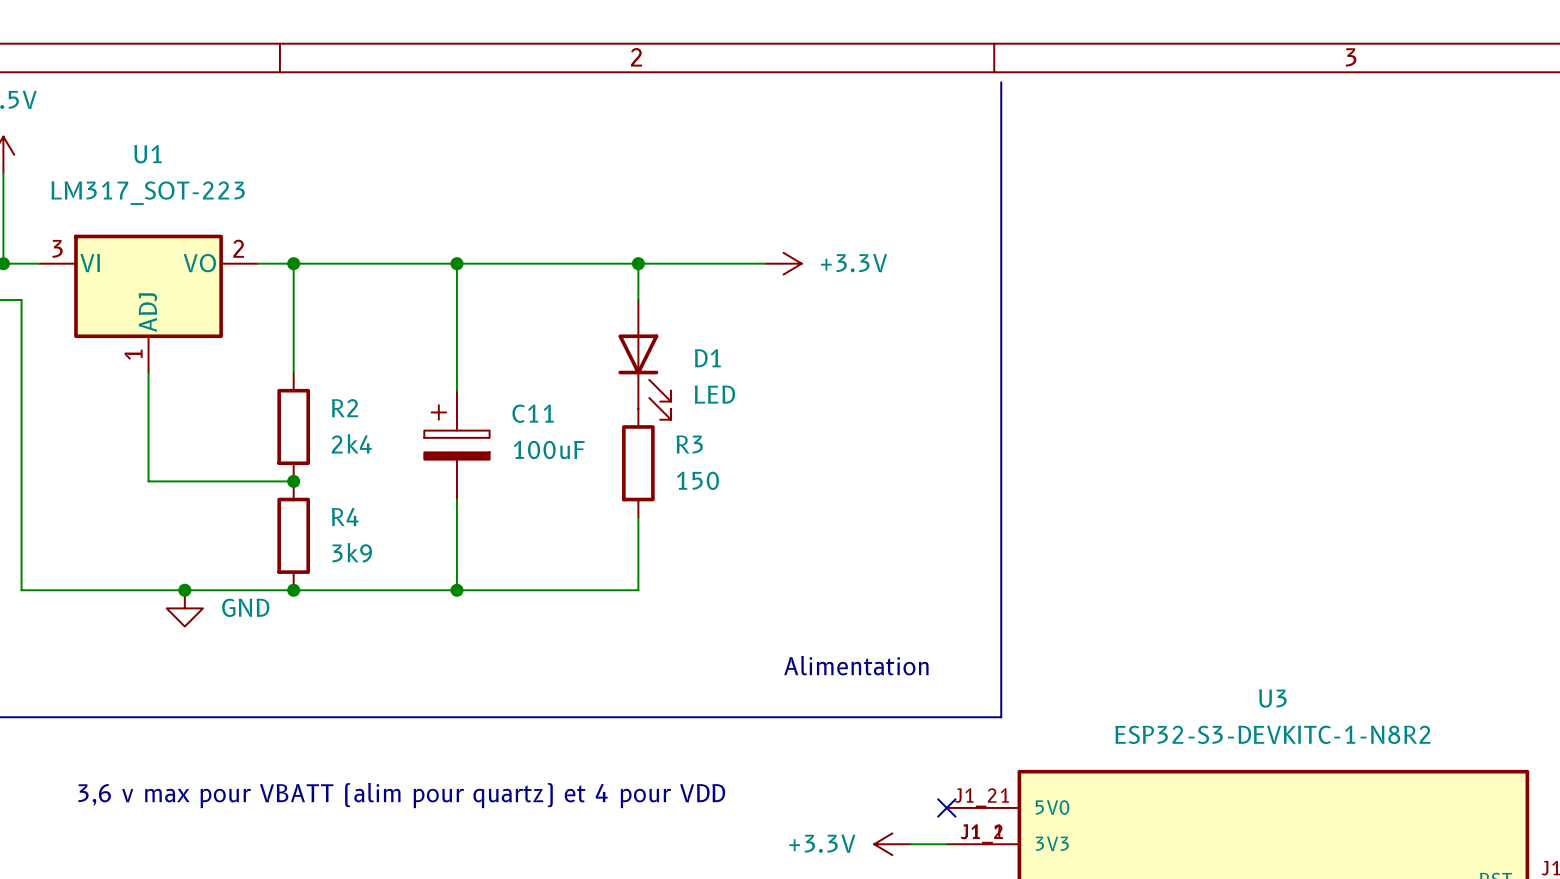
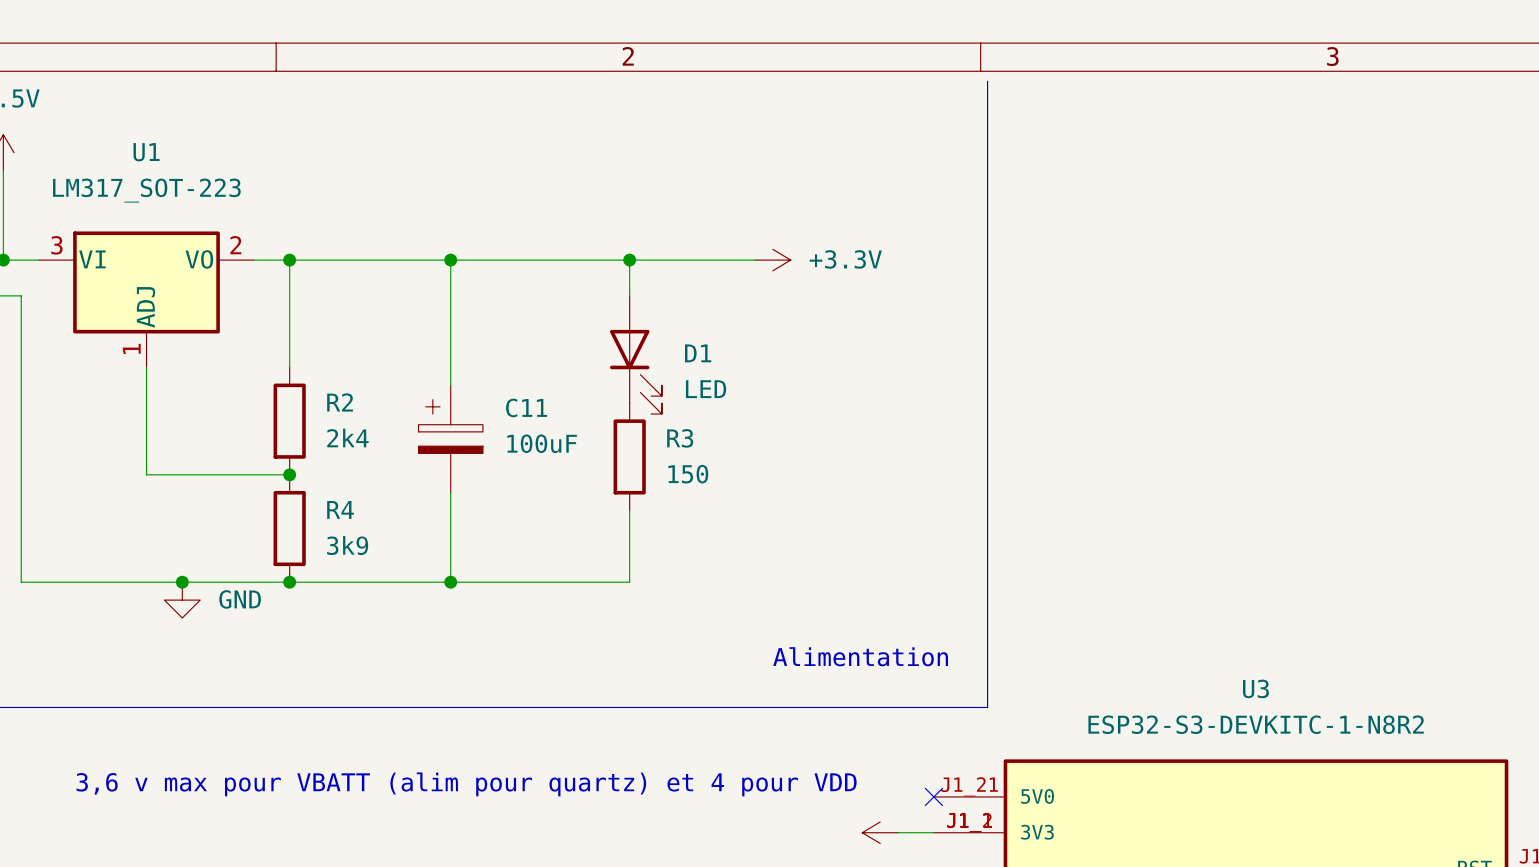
power symbol text: +3.3V (822, 843) -> none

